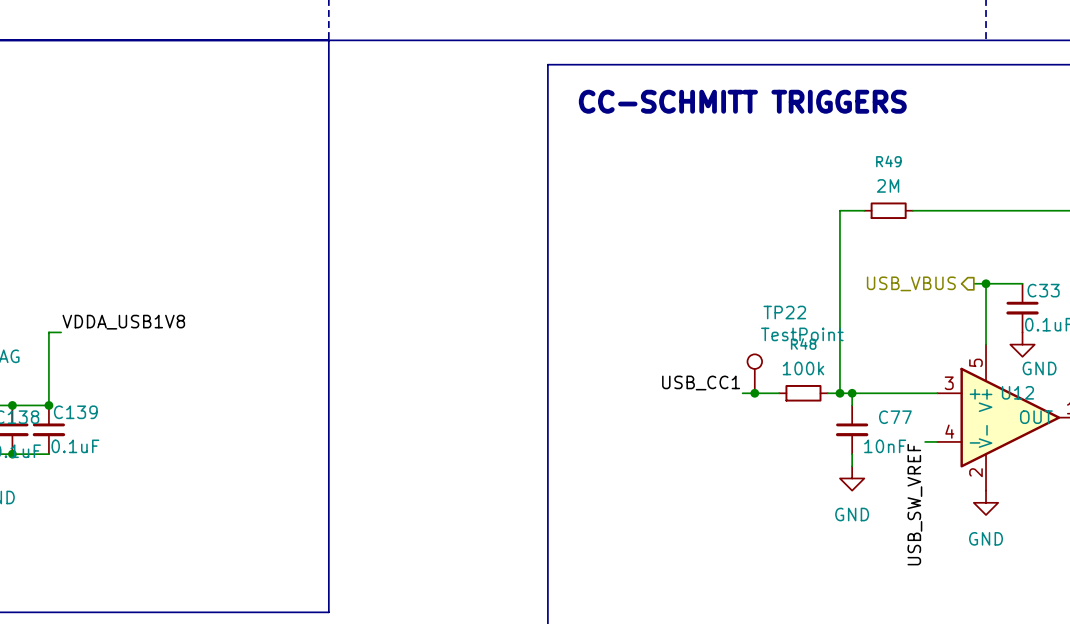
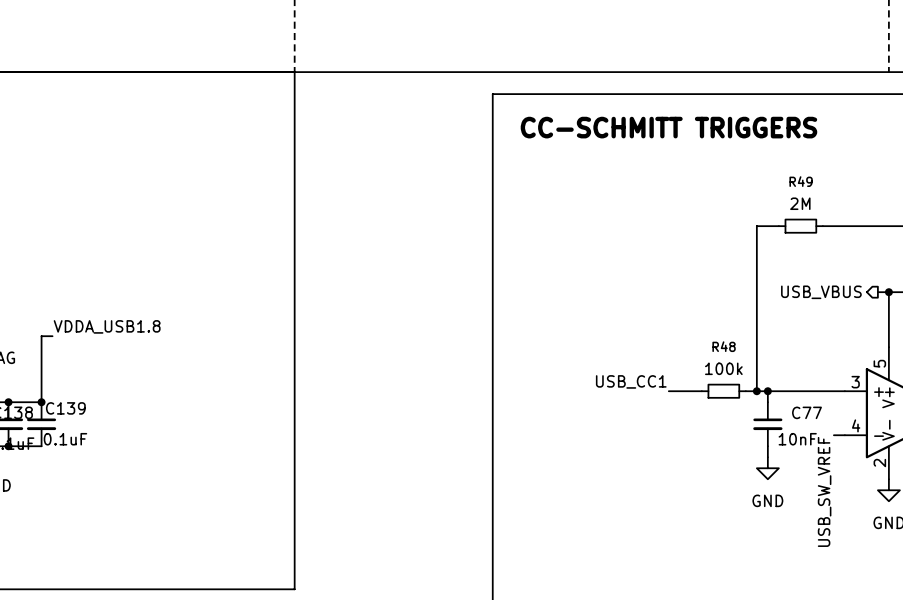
label: VDDA_USB1V8 (123, 322) -> VDDA_USB1.8 (107, 326)
TP22: TestPoint (754, 373) -> none
junction: (754, 393) -> none

